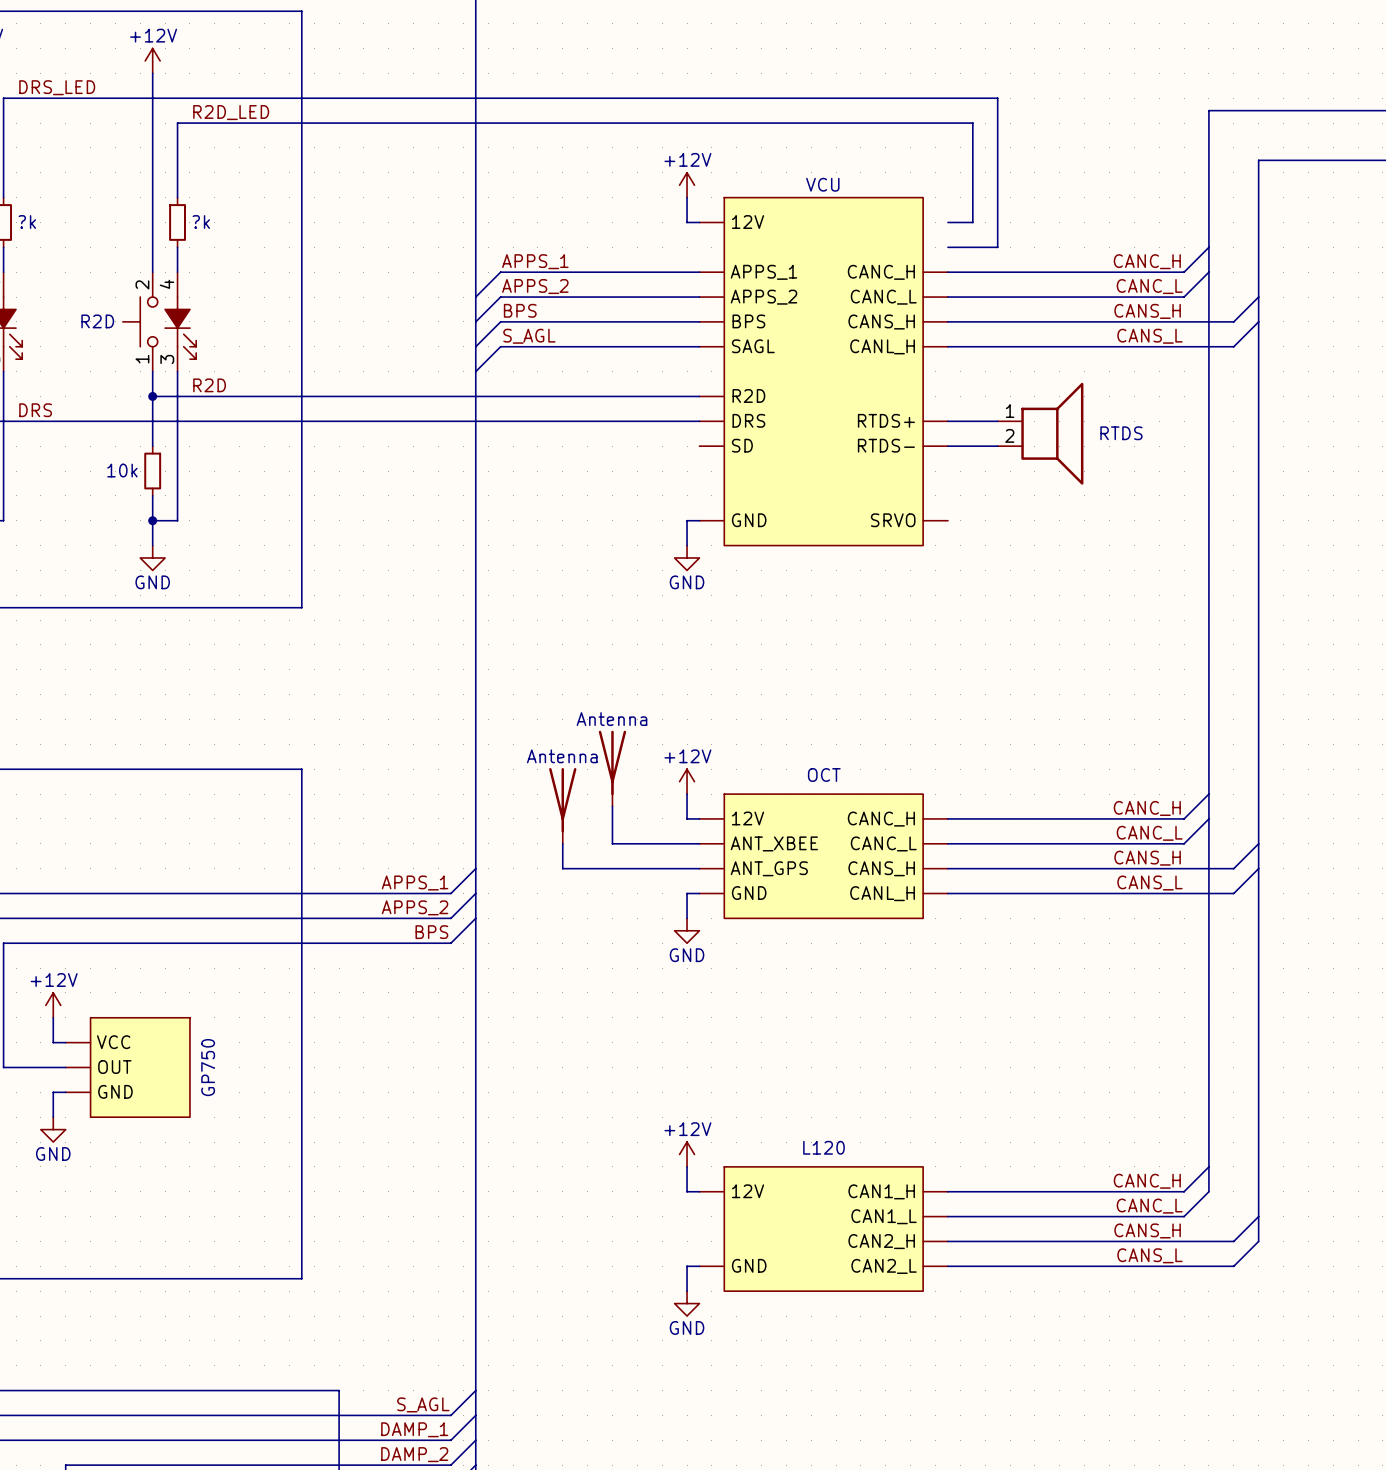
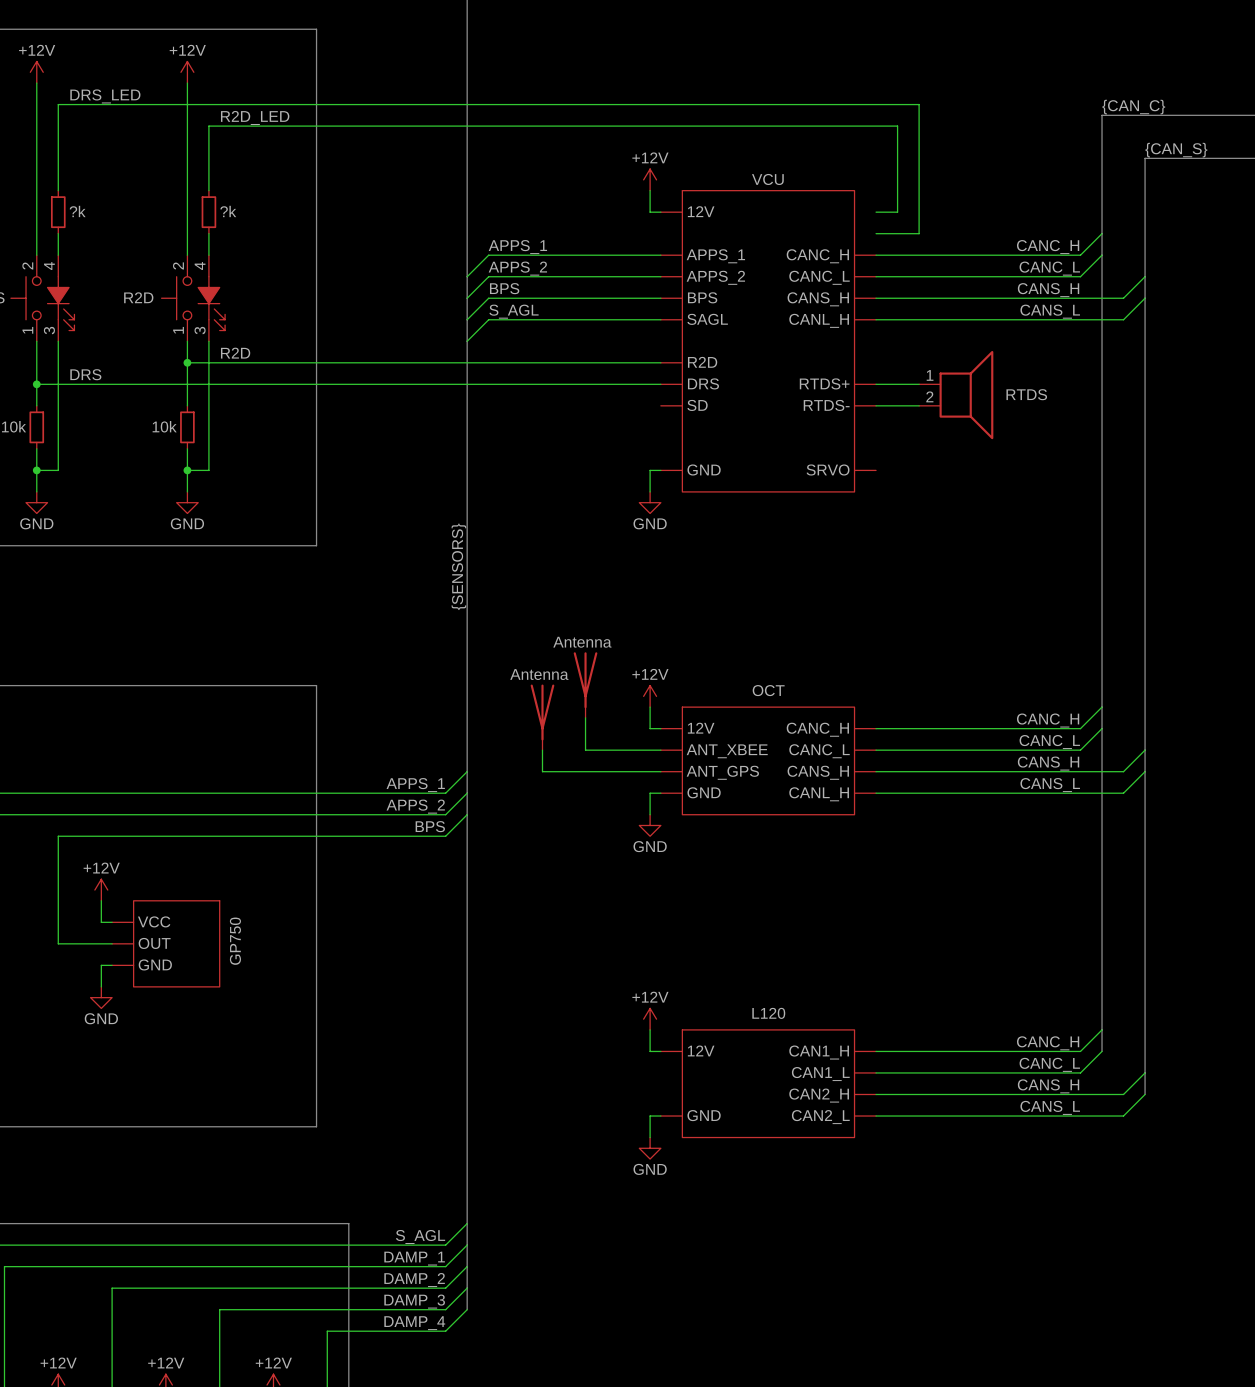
label: none -> {CAN_C} (1133, 107)
label: none -> {CAN_S} (1176, 150)
label: none -> {SENSORS} (458, 566)

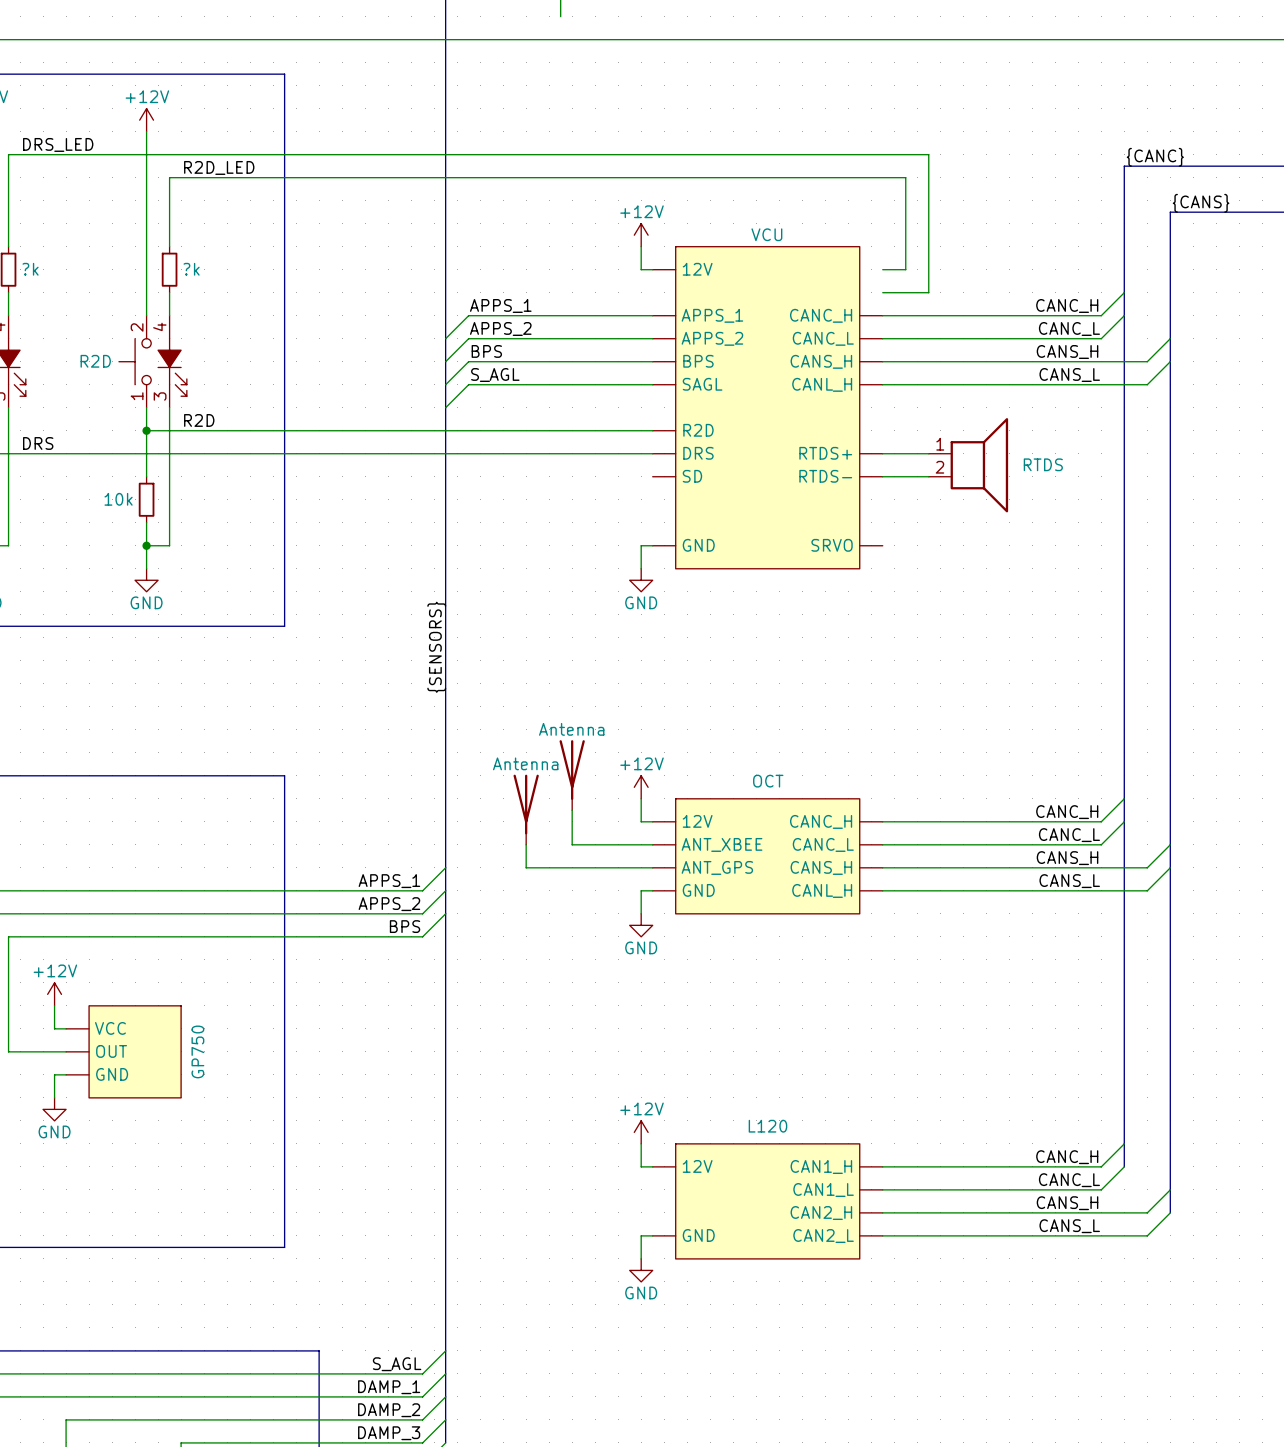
label: {CAN_C} (1133, 107) -> {CANC} (1155, 157)
label: {CAN_S} (1176, 150) -> {CANS} (1201, 203)

